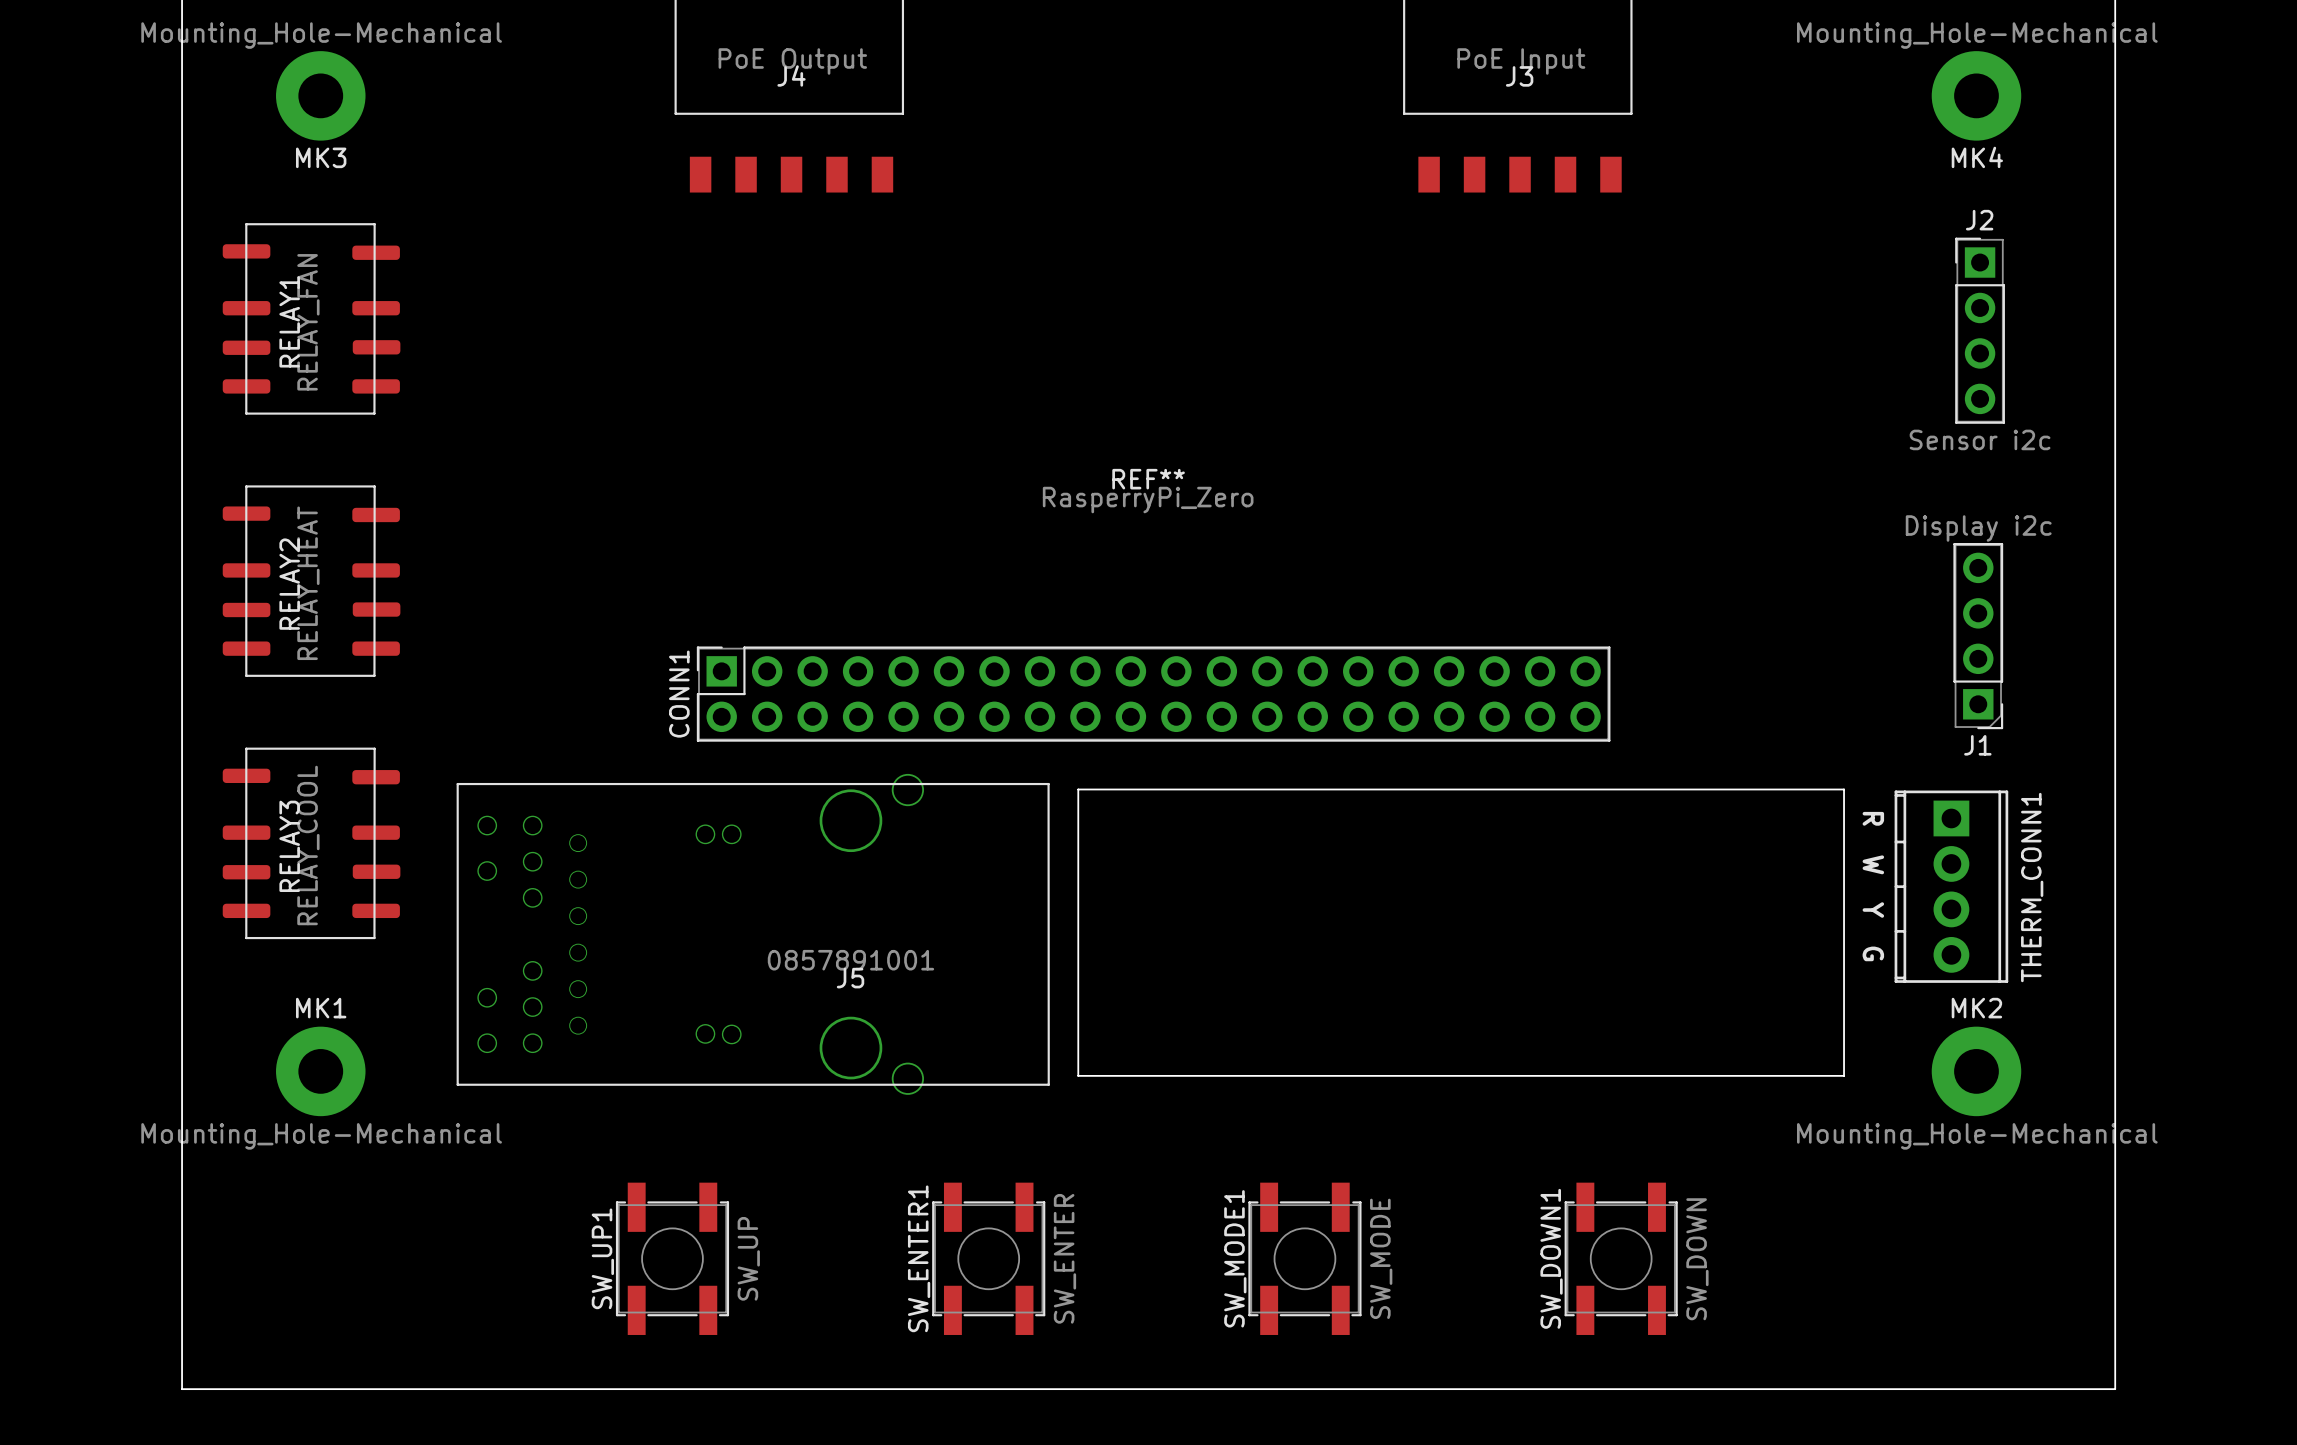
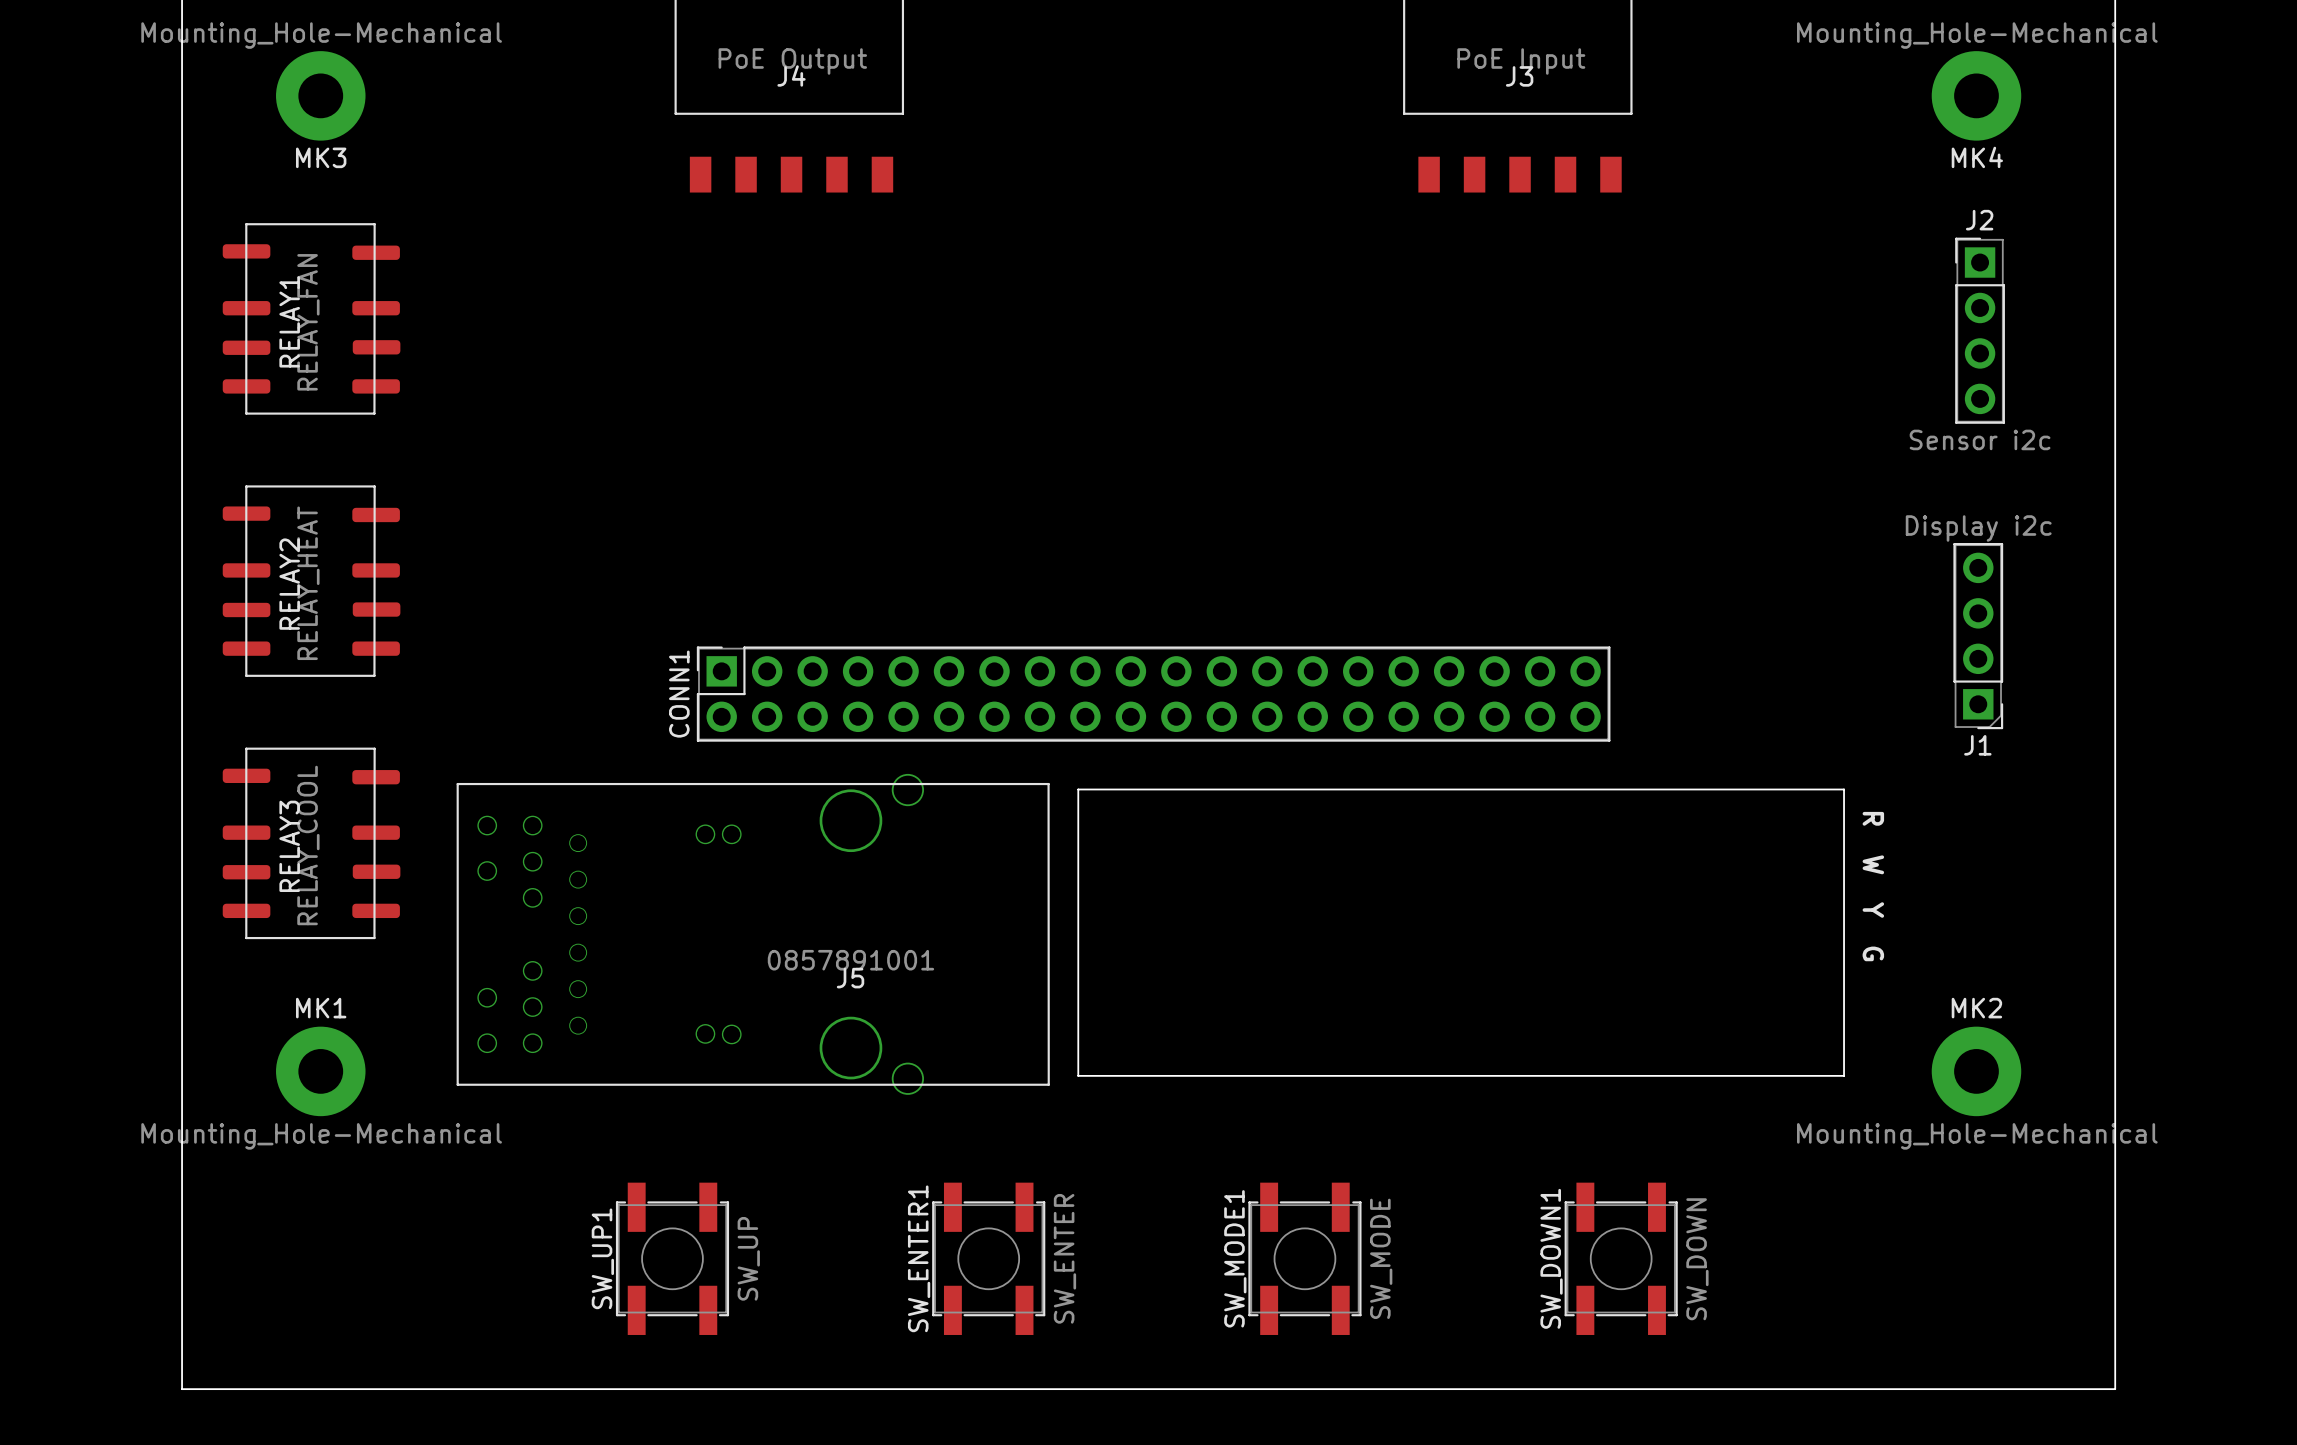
REF**: RasperryPi_Zero (1148, 491) -> none
THERM_CONN1: (1951, 886) -> none

